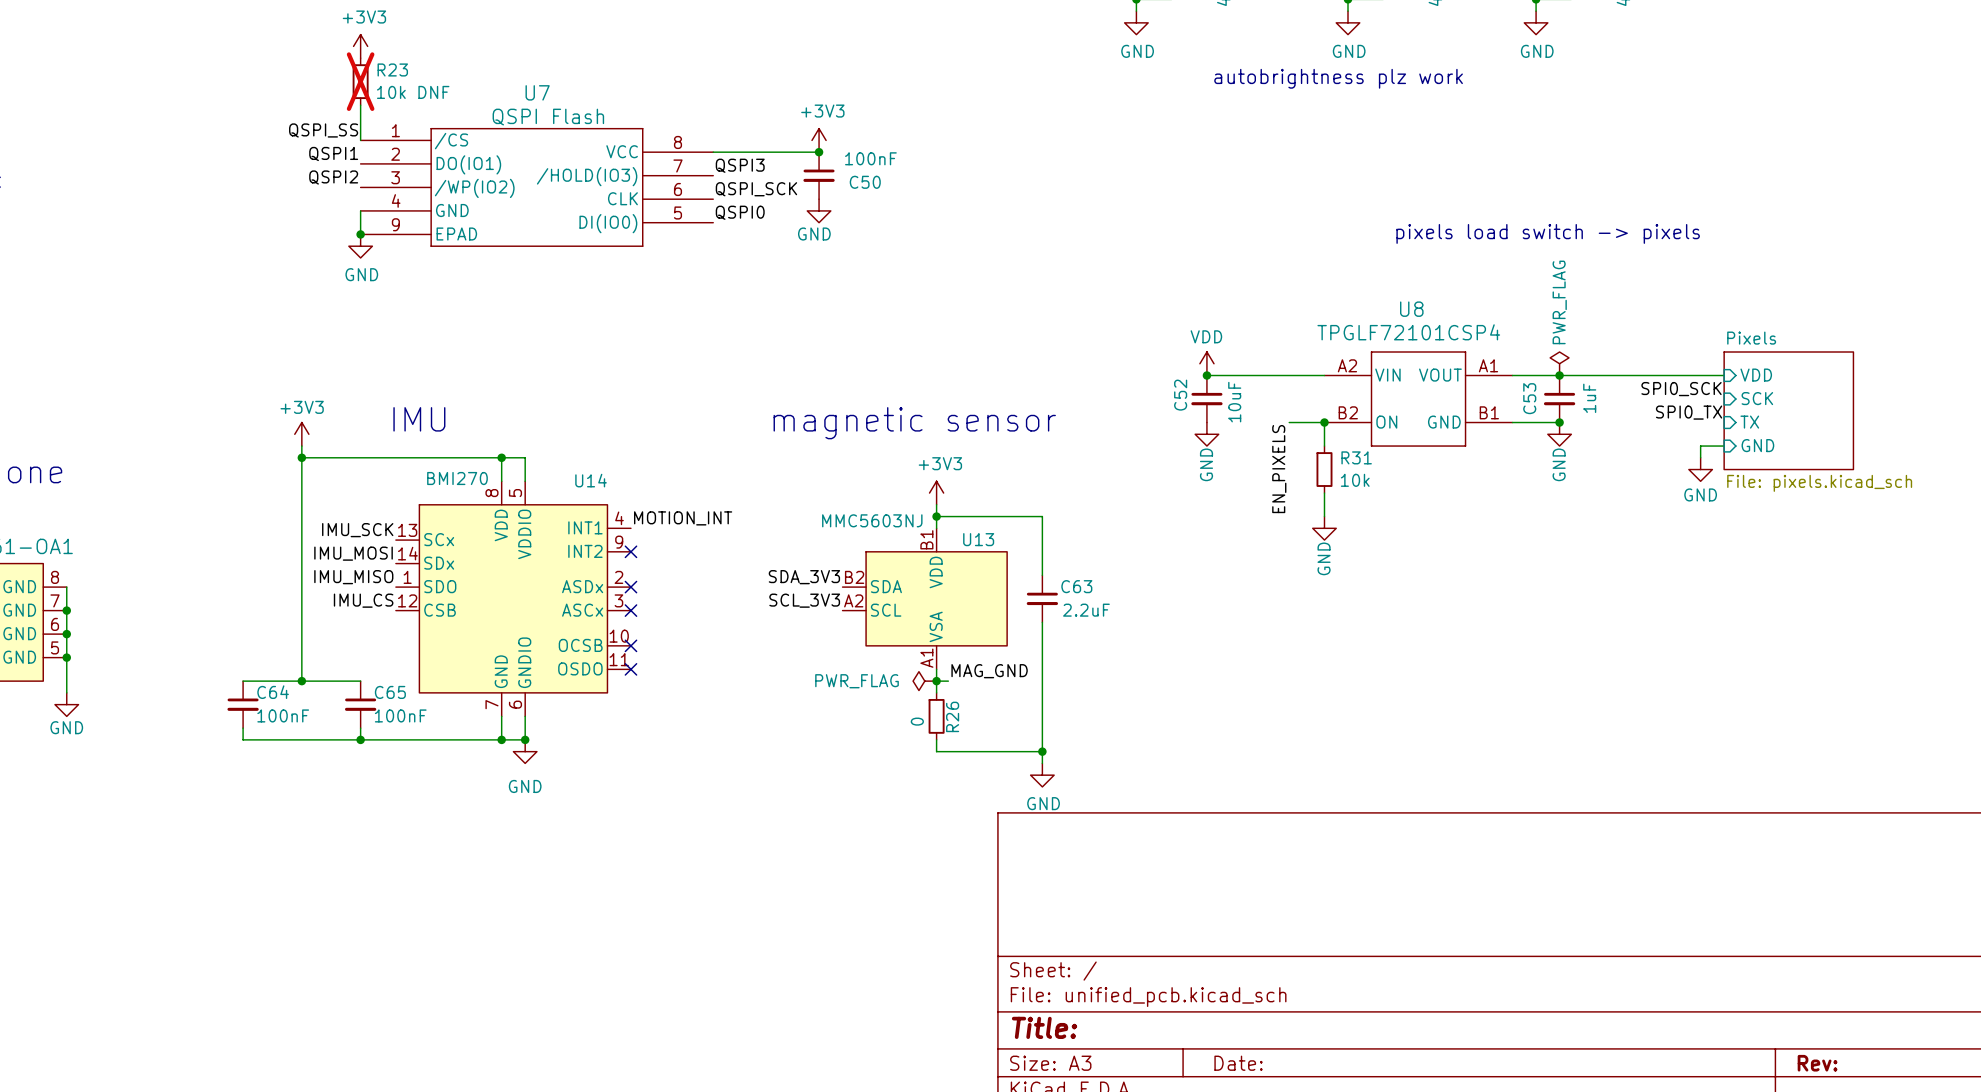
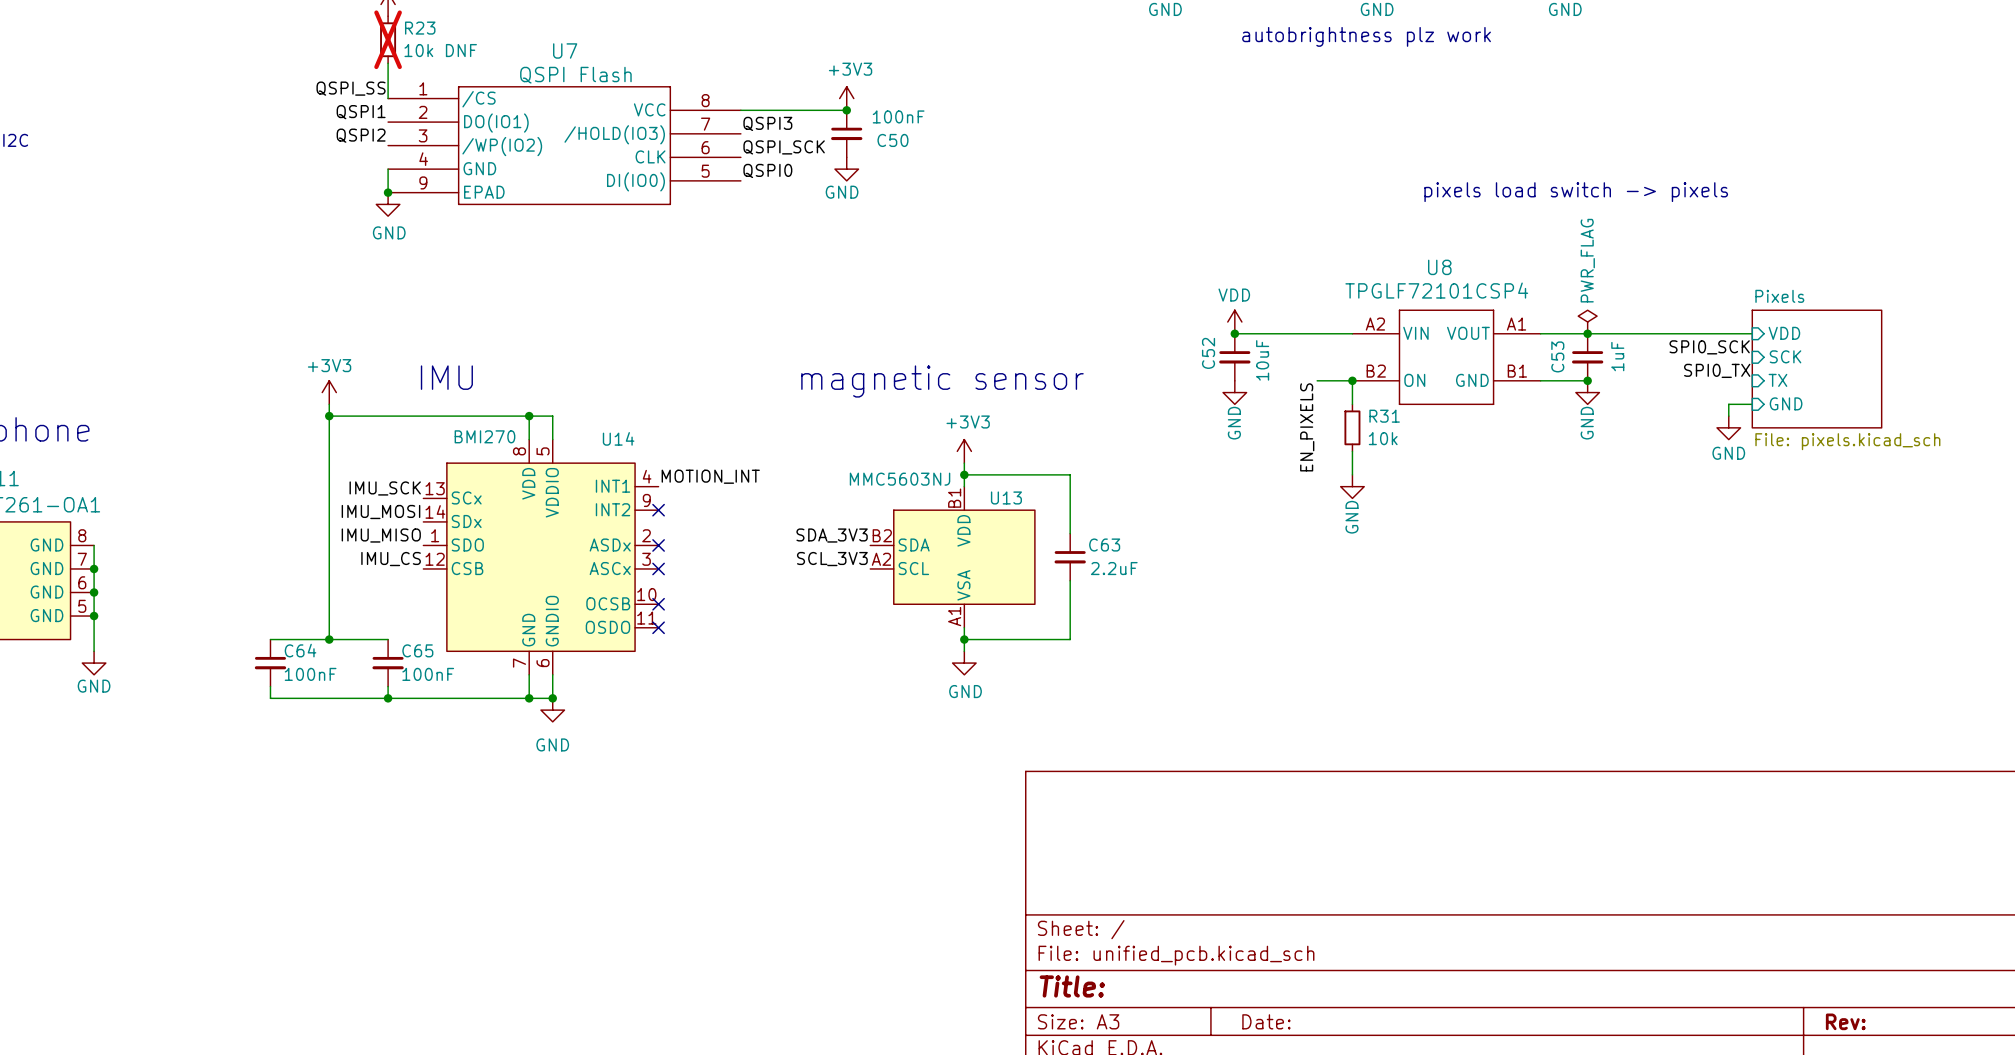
label: MAG_GND (989, 671) -> none
power symbol: PWR_FLAG (924, 681) -> none
wire: (1042, 681) (1042, 763) -> (1070, 639) (976, 639)
R26: 0 (936, 716) -> none
wire: (936, 739) (936, 751) (1042, 751) -> none
junction: (1042, 751) -> none
power symbol position: GND (1042, 775) -> GND (964, 663)

